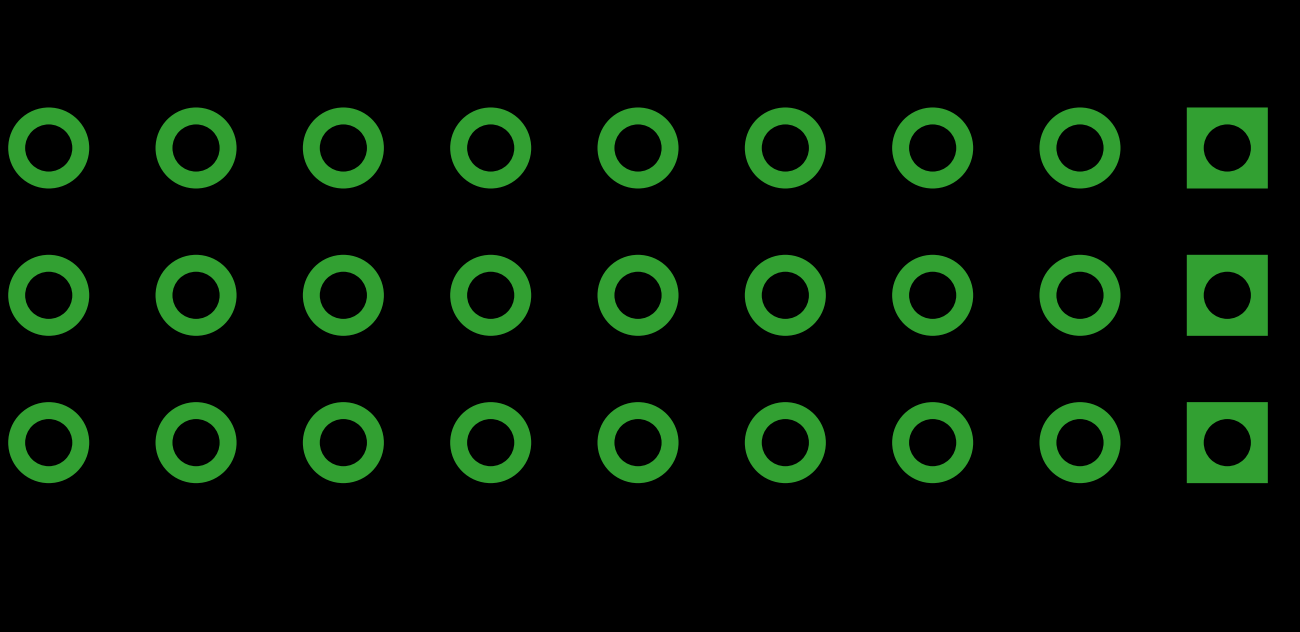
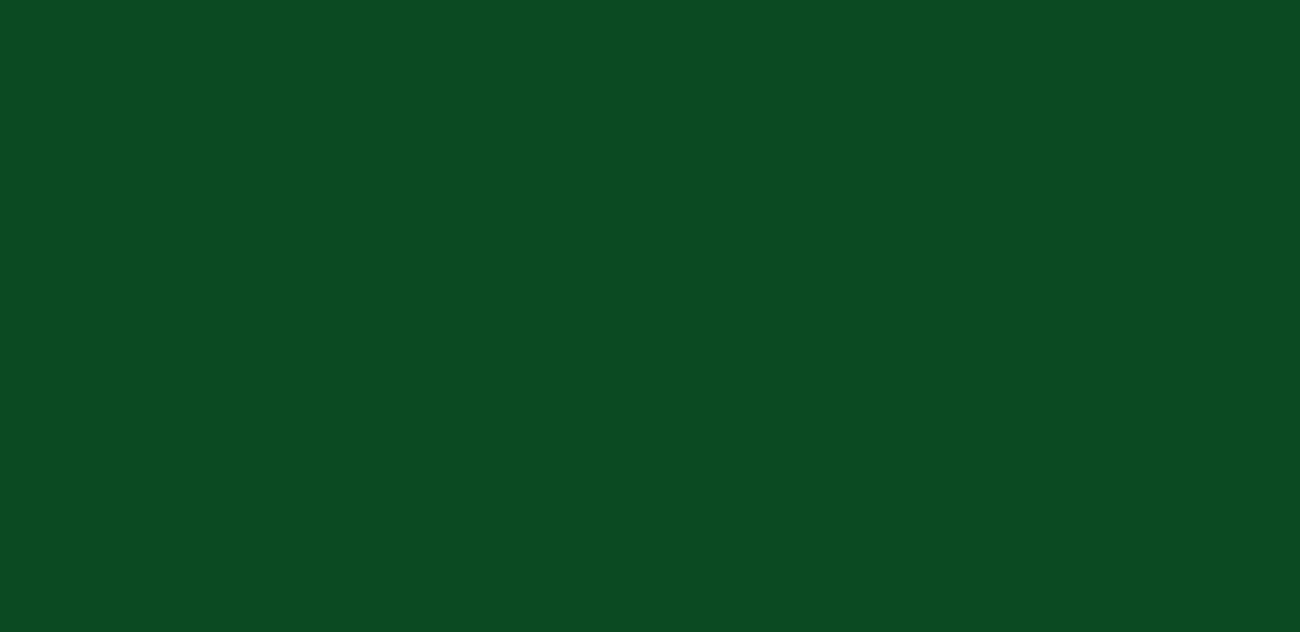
part: (638, 147) -> none
part: (638, 295) -> none
part: (638, 442) -> none

